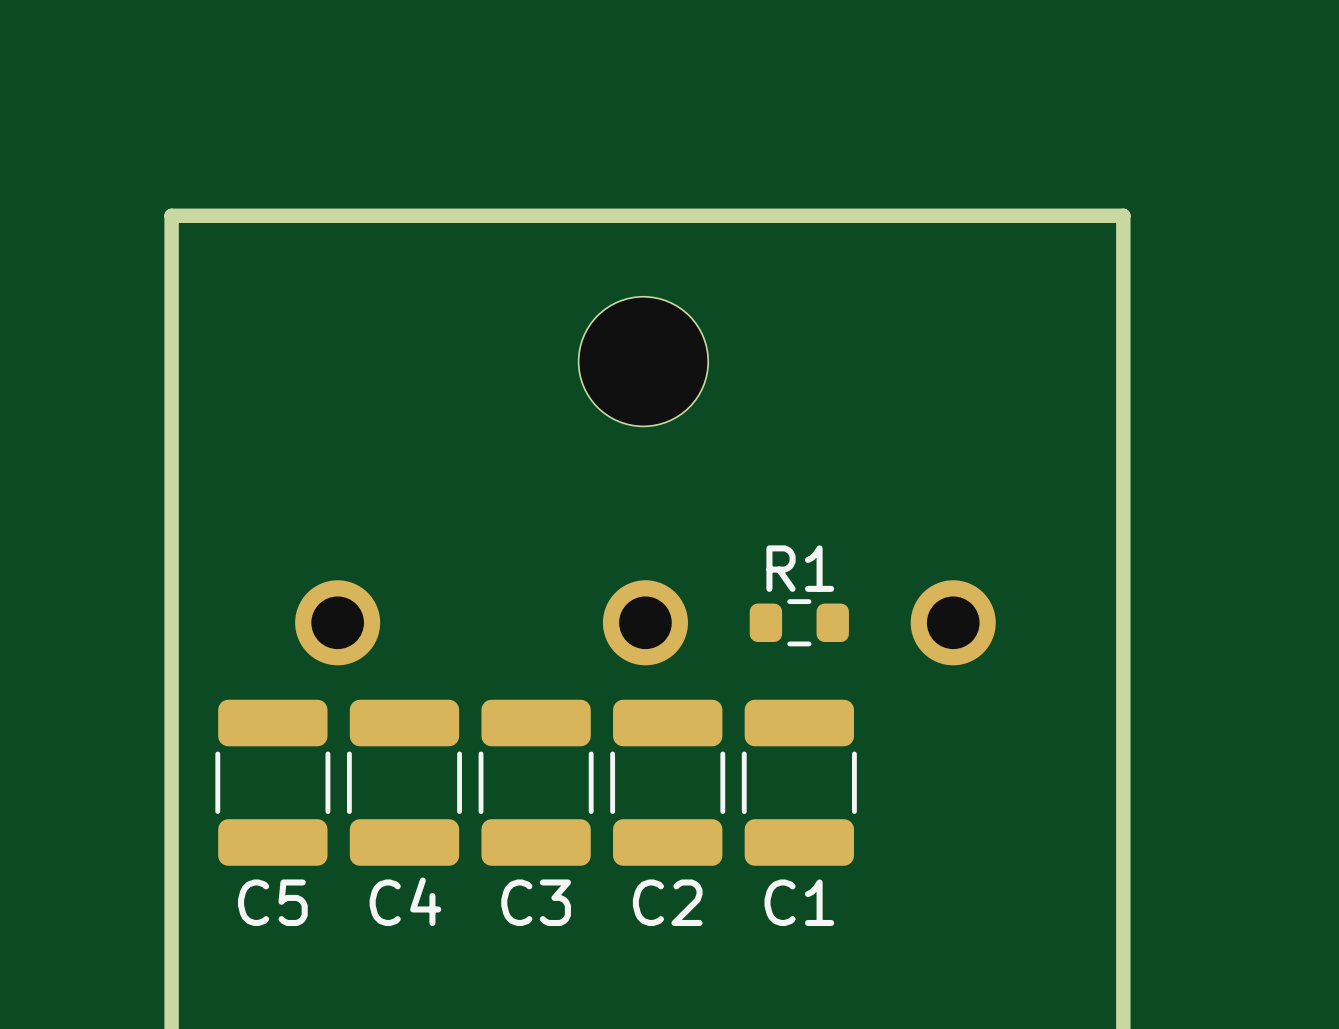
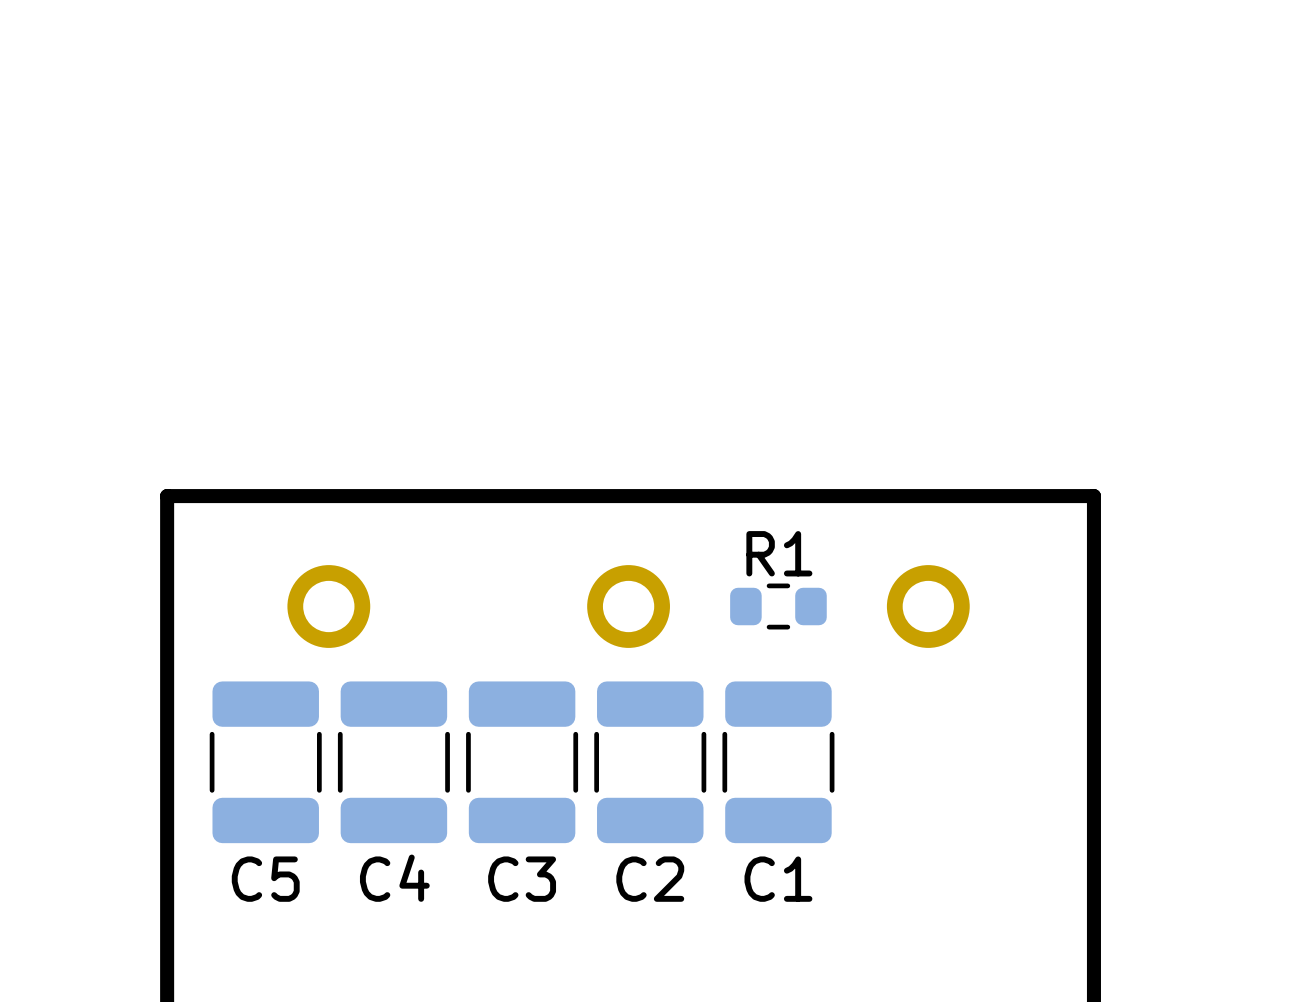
part: (643, 361) -> none
board edge: (1123, 509) (1123, 215) (171, 215) (171, 509) -> (1093, 496) (167, 496)

